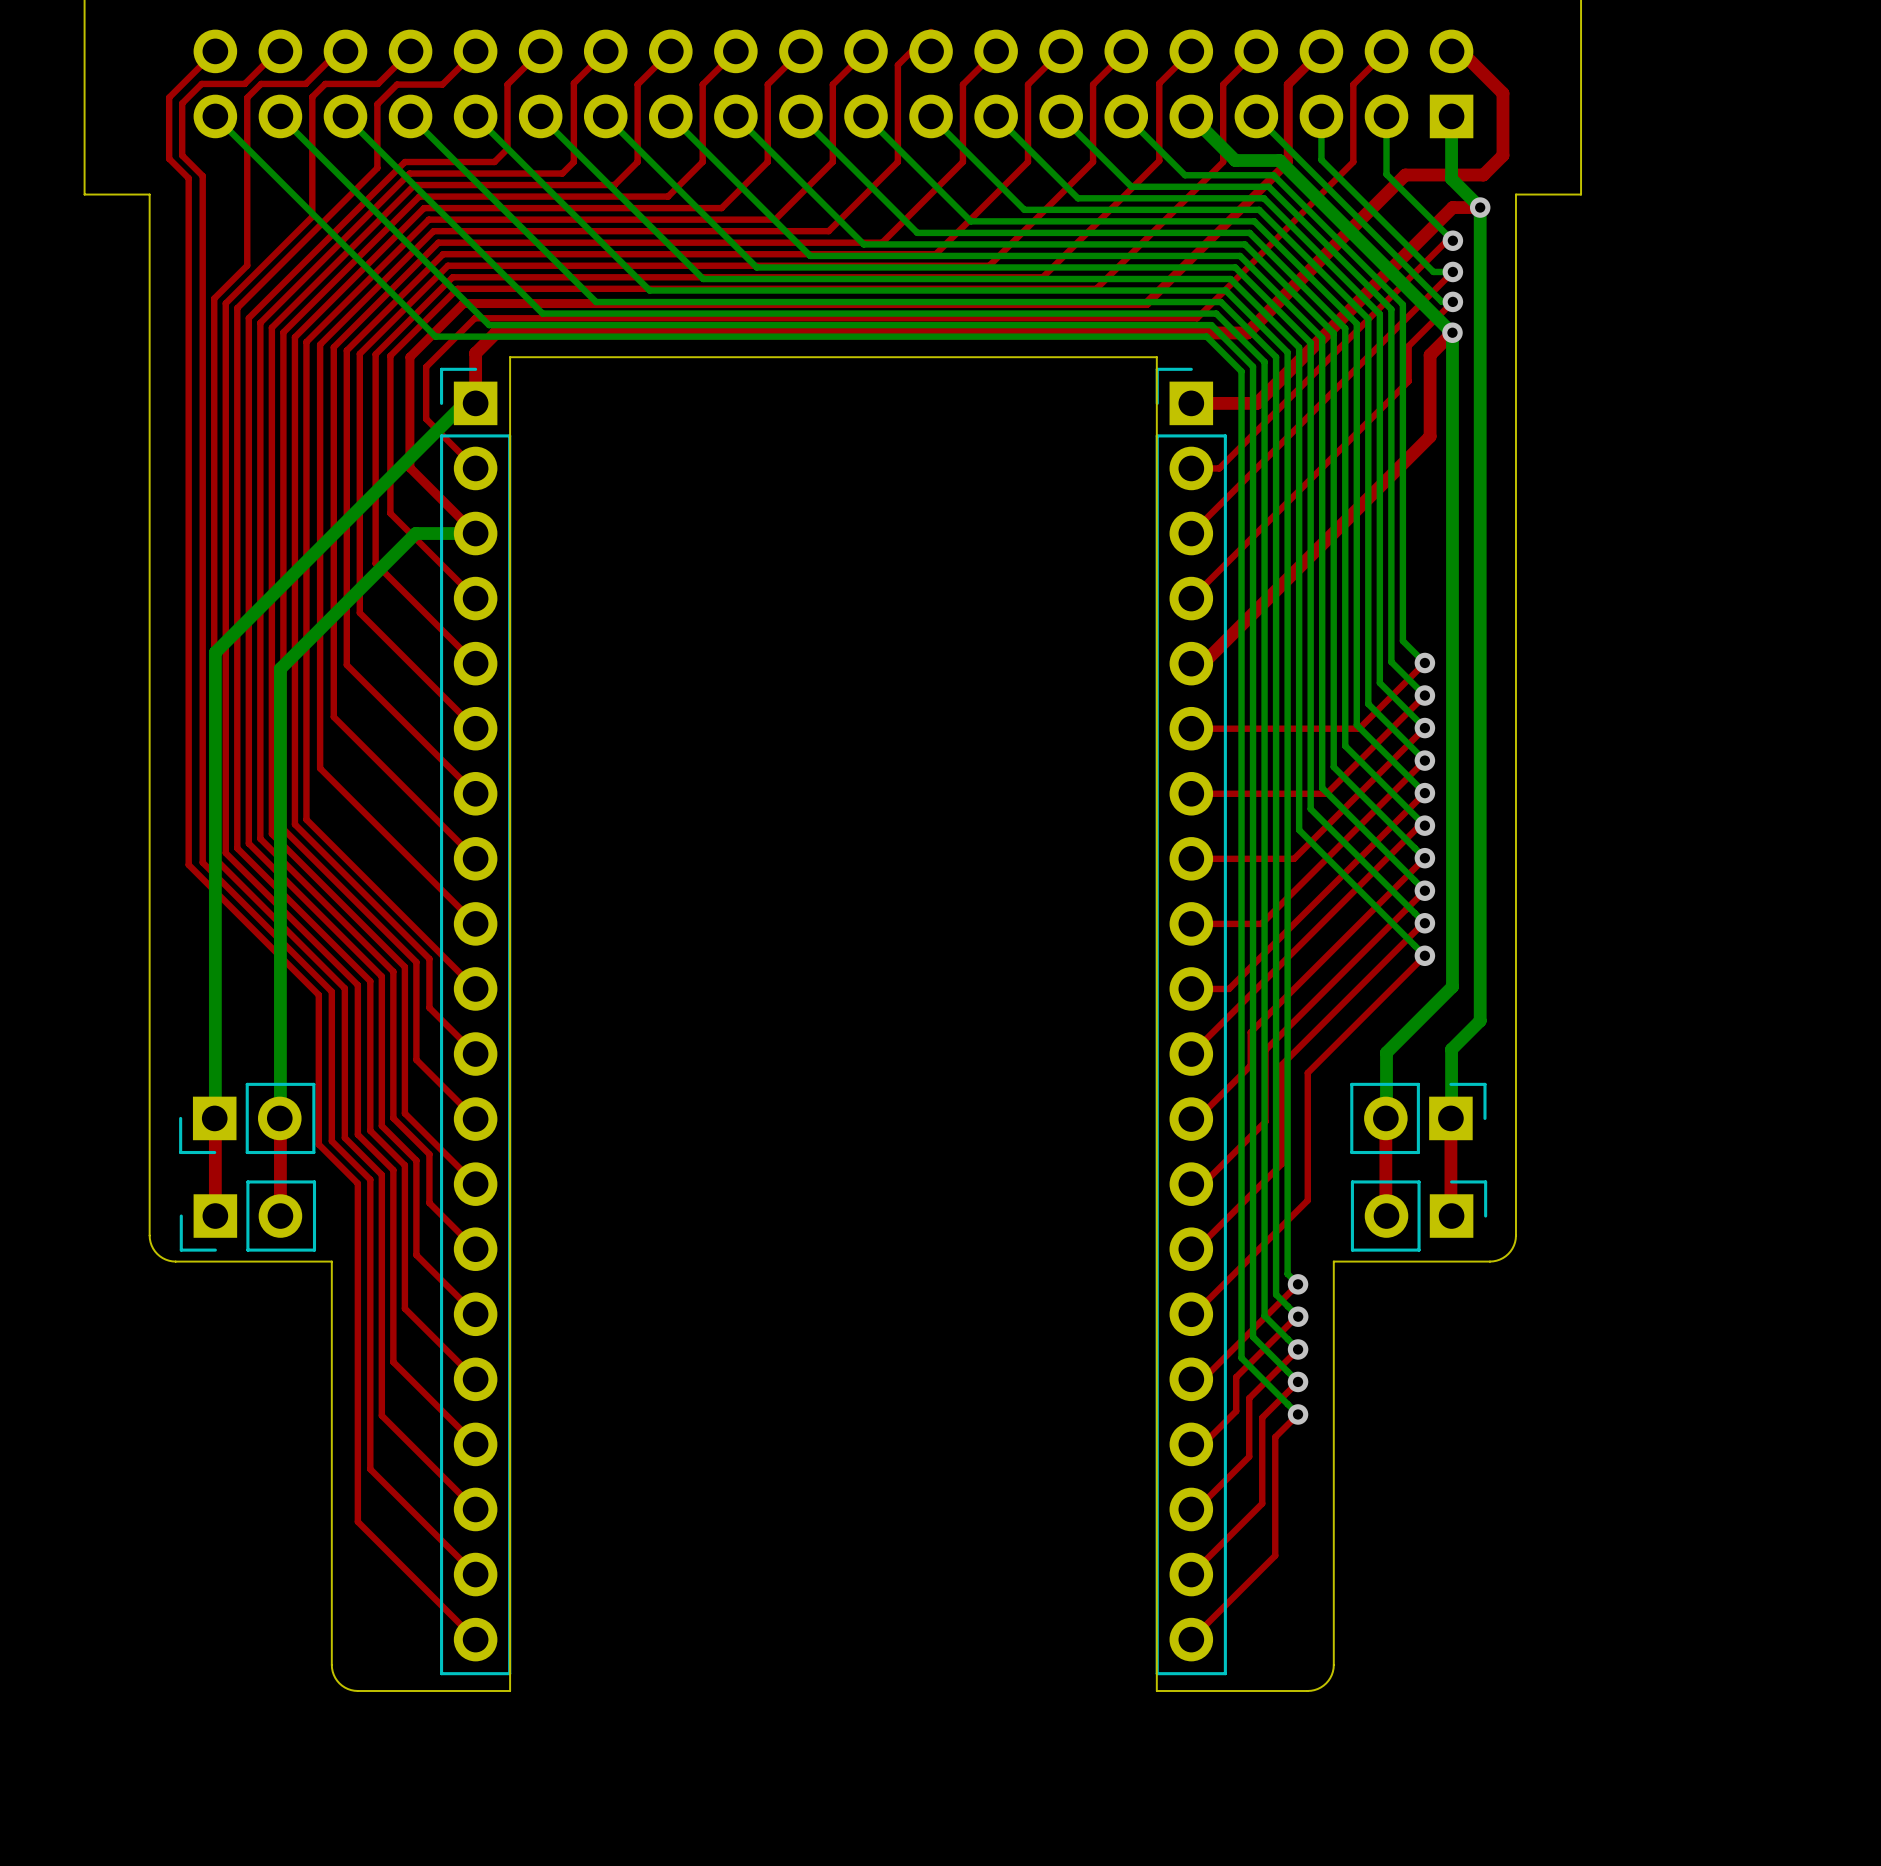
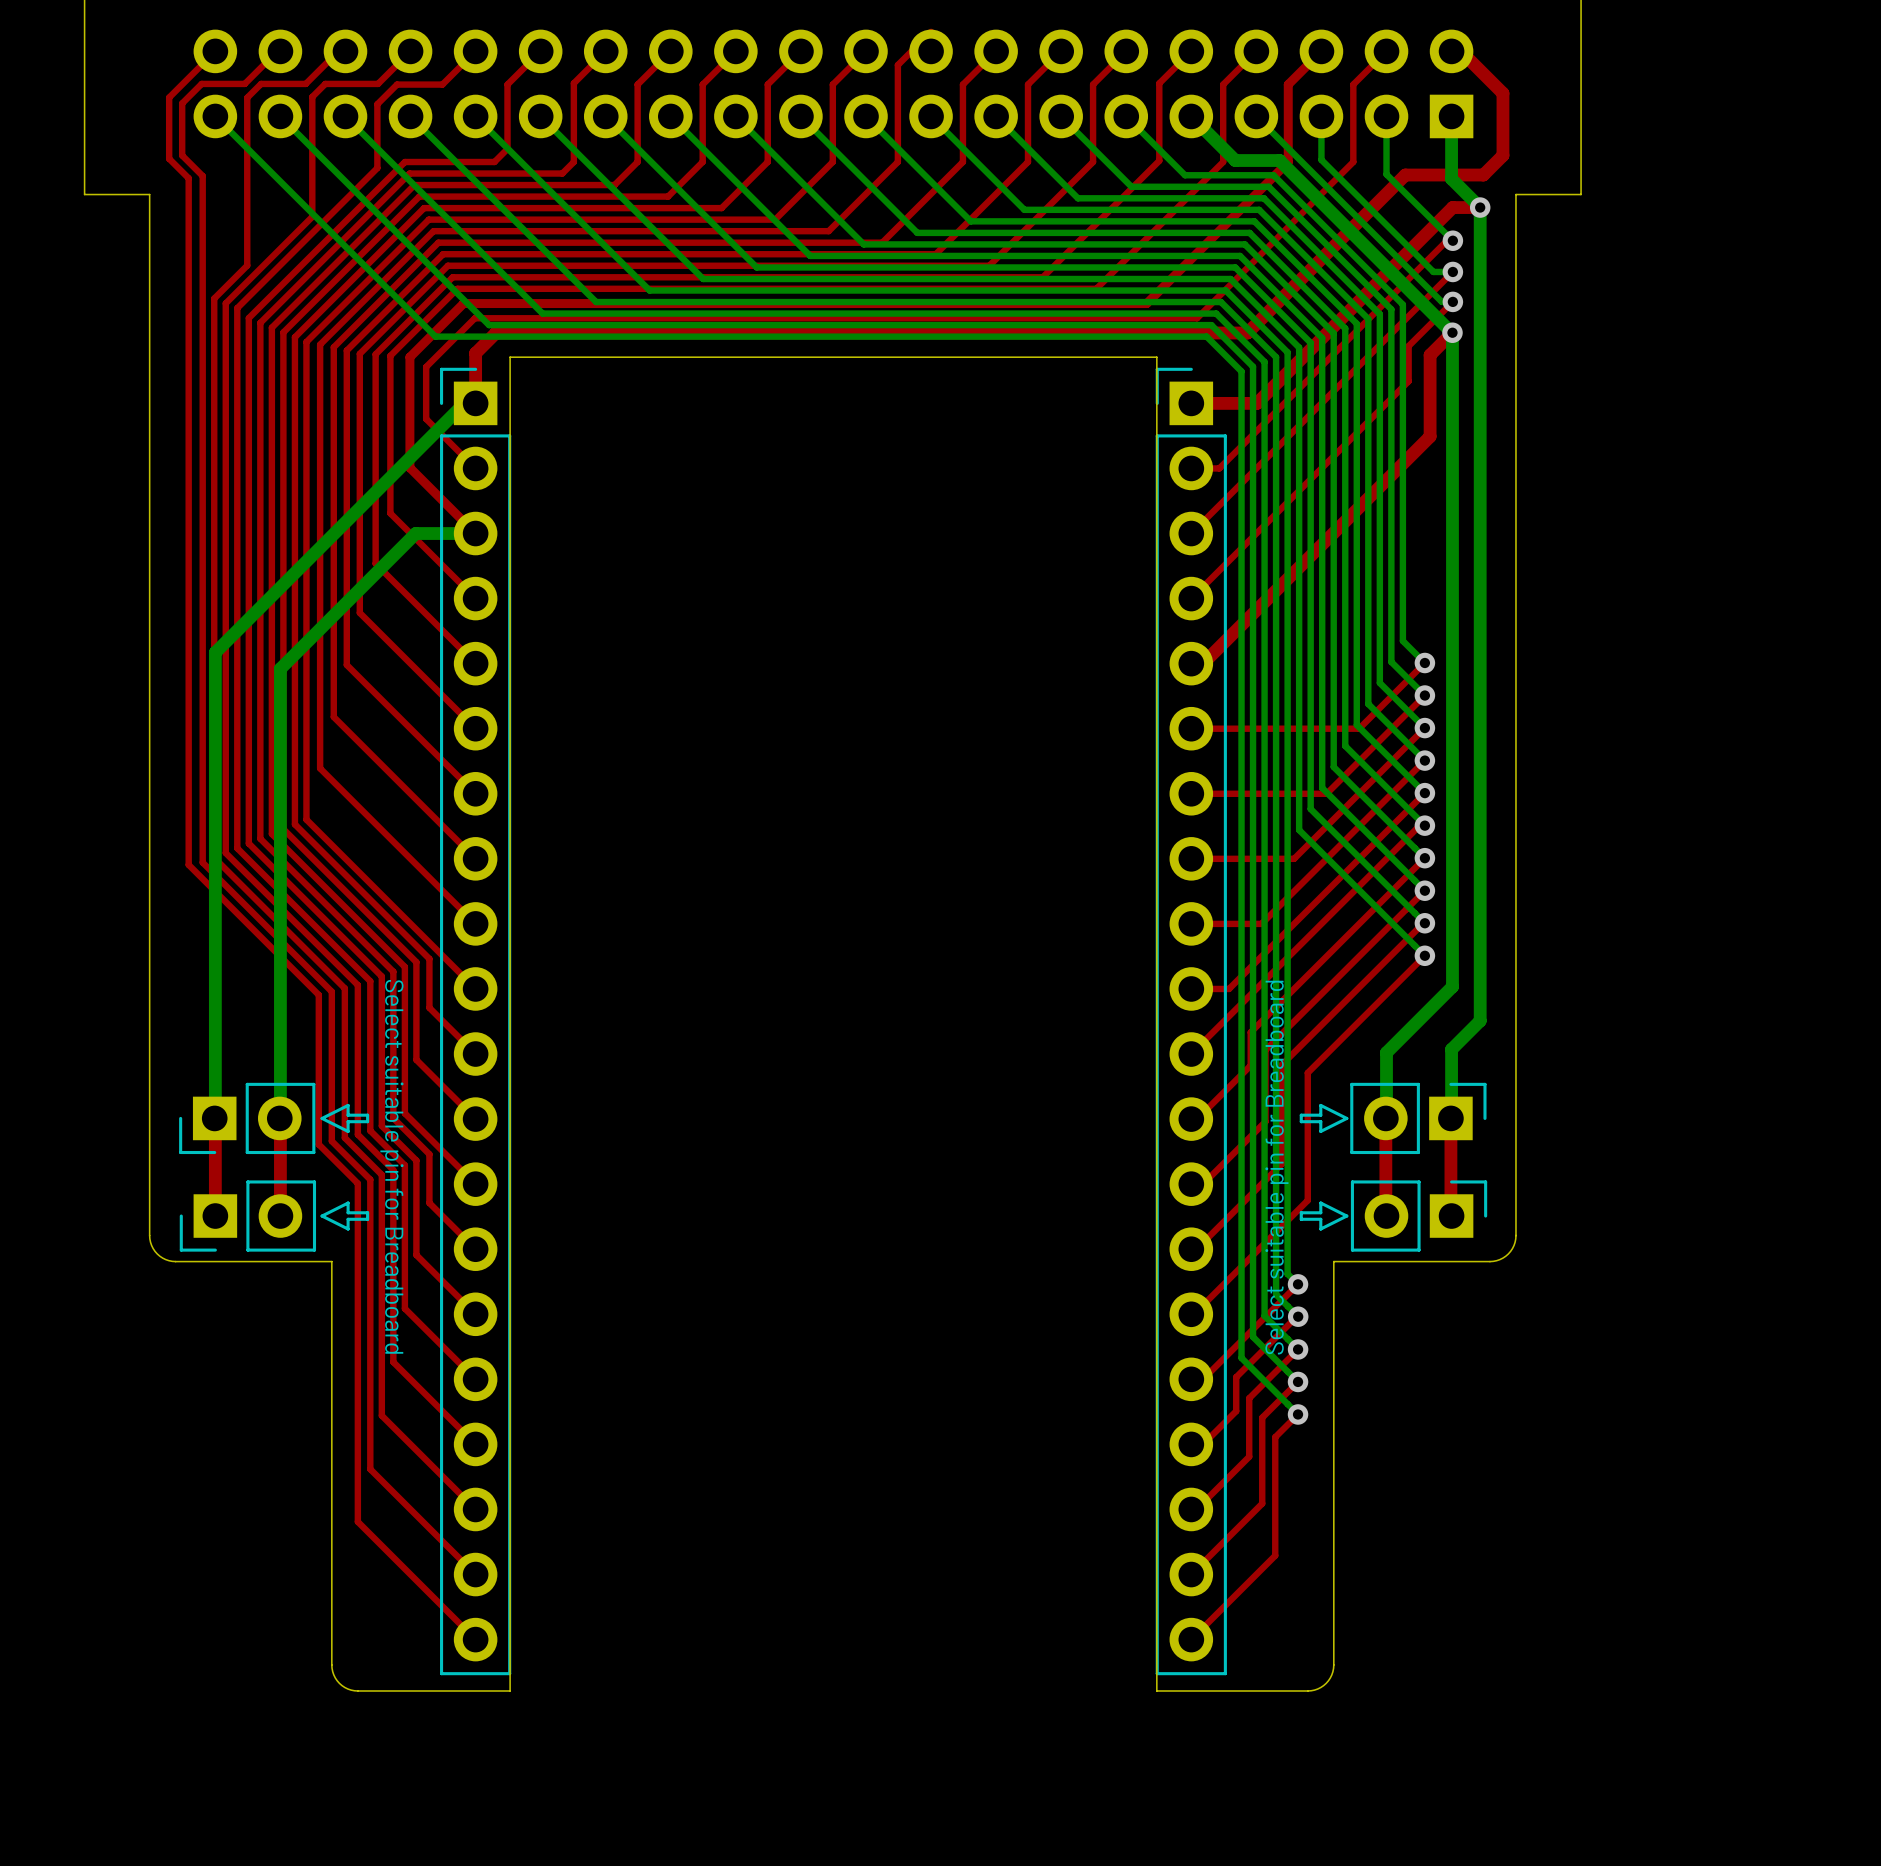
line: none -> (348, 1105) (348, 1115) (367, 1115) (367, 1121) (348, 1121) (348, 1131) (322, 1118) (348, 1105)
line: none -> (1320, 1105) (1320, 1115) (1301, 1115) (1301, 1121) (1320, 1121) (1320, 1131) (1346, 1118) (1320, 1105)
text: none -> Select suitable pin for Breadboard (391, 1166)
text: none -> Select suitable pin for Breadboard (1276, 1167)
line: none -> (348, 1203) (348, 1212) (367, 1212) (367, 1219) (348, 1219) (348, 1229) (322, 1216) (348, 1203)
line: none -> (1320, 1203) (1320, 1212) (1301, 1212) (1301, 1219) (1320, 1219) (1320, 1229) (1346, 1216) (1320, 1203)

